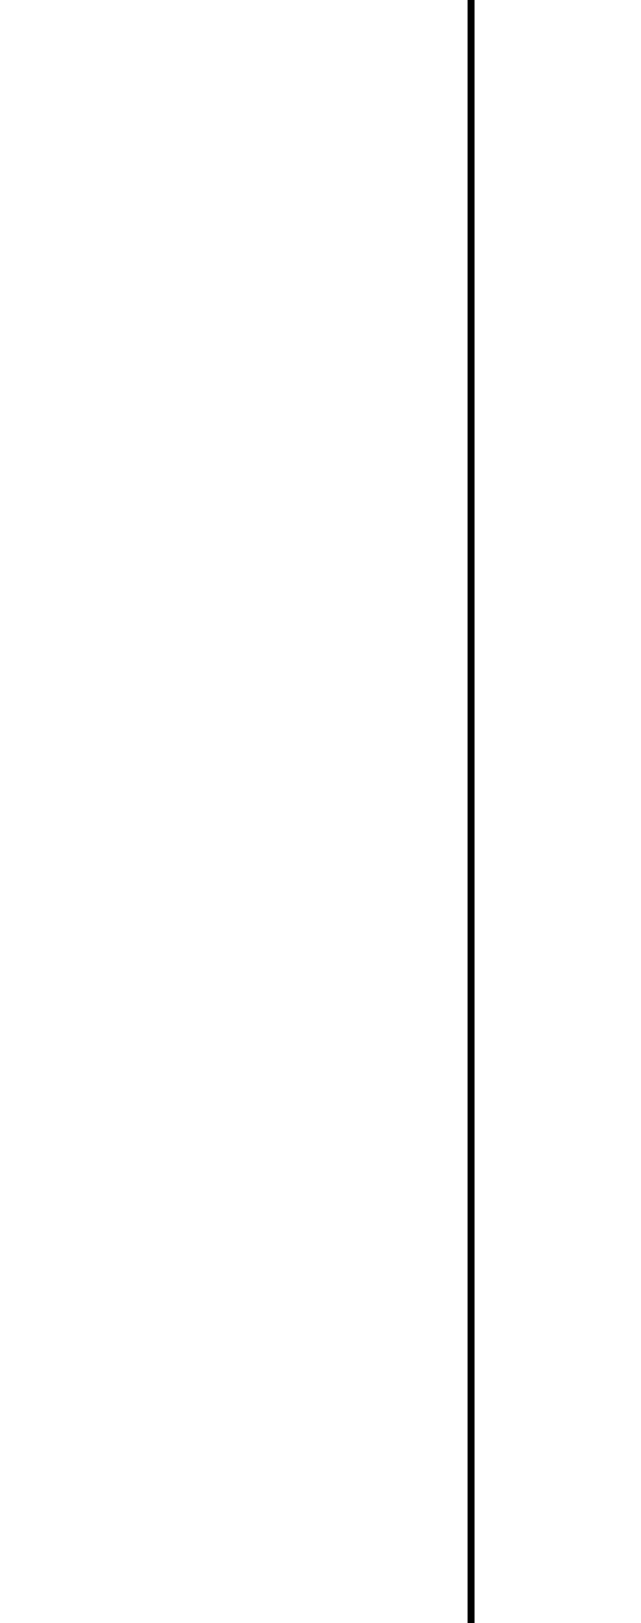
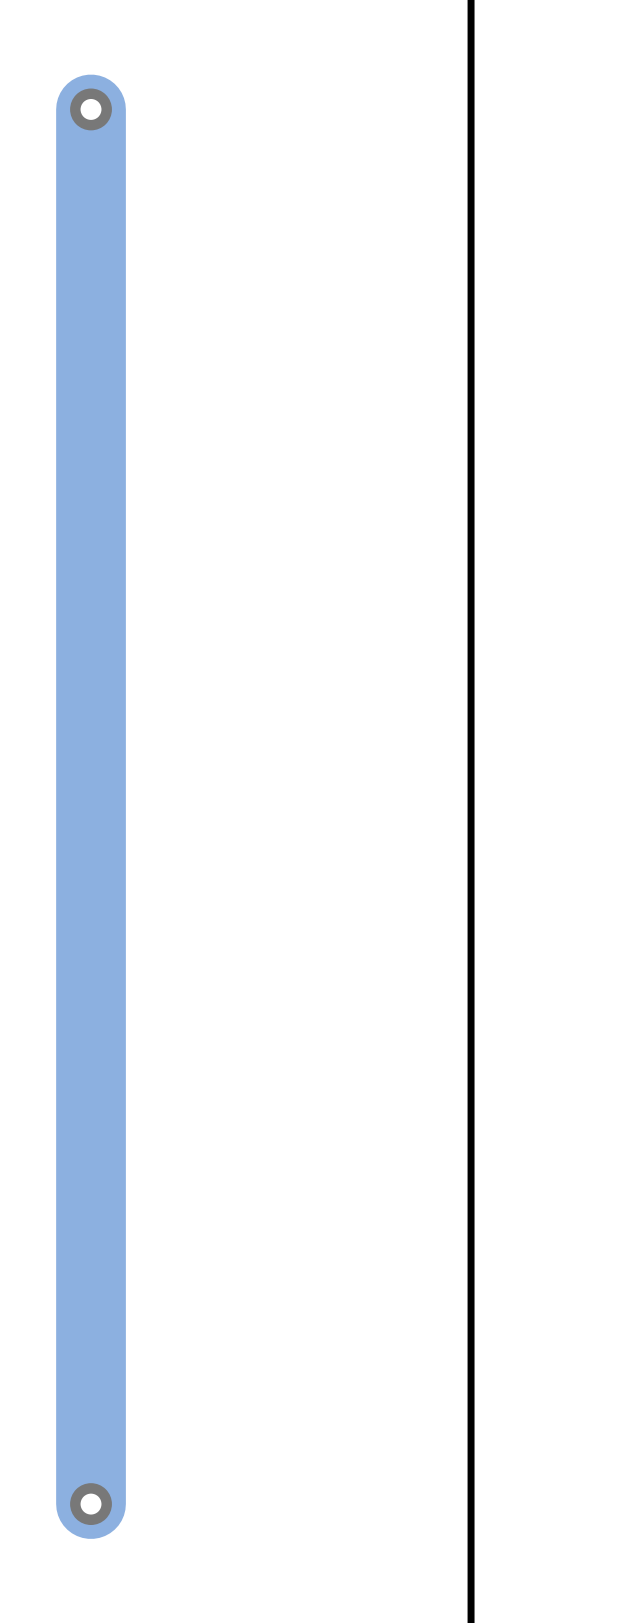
track: none -> (91, 109) (91, 1504)
via: none -> (91, 109)
via: none -> (91, 1504)

